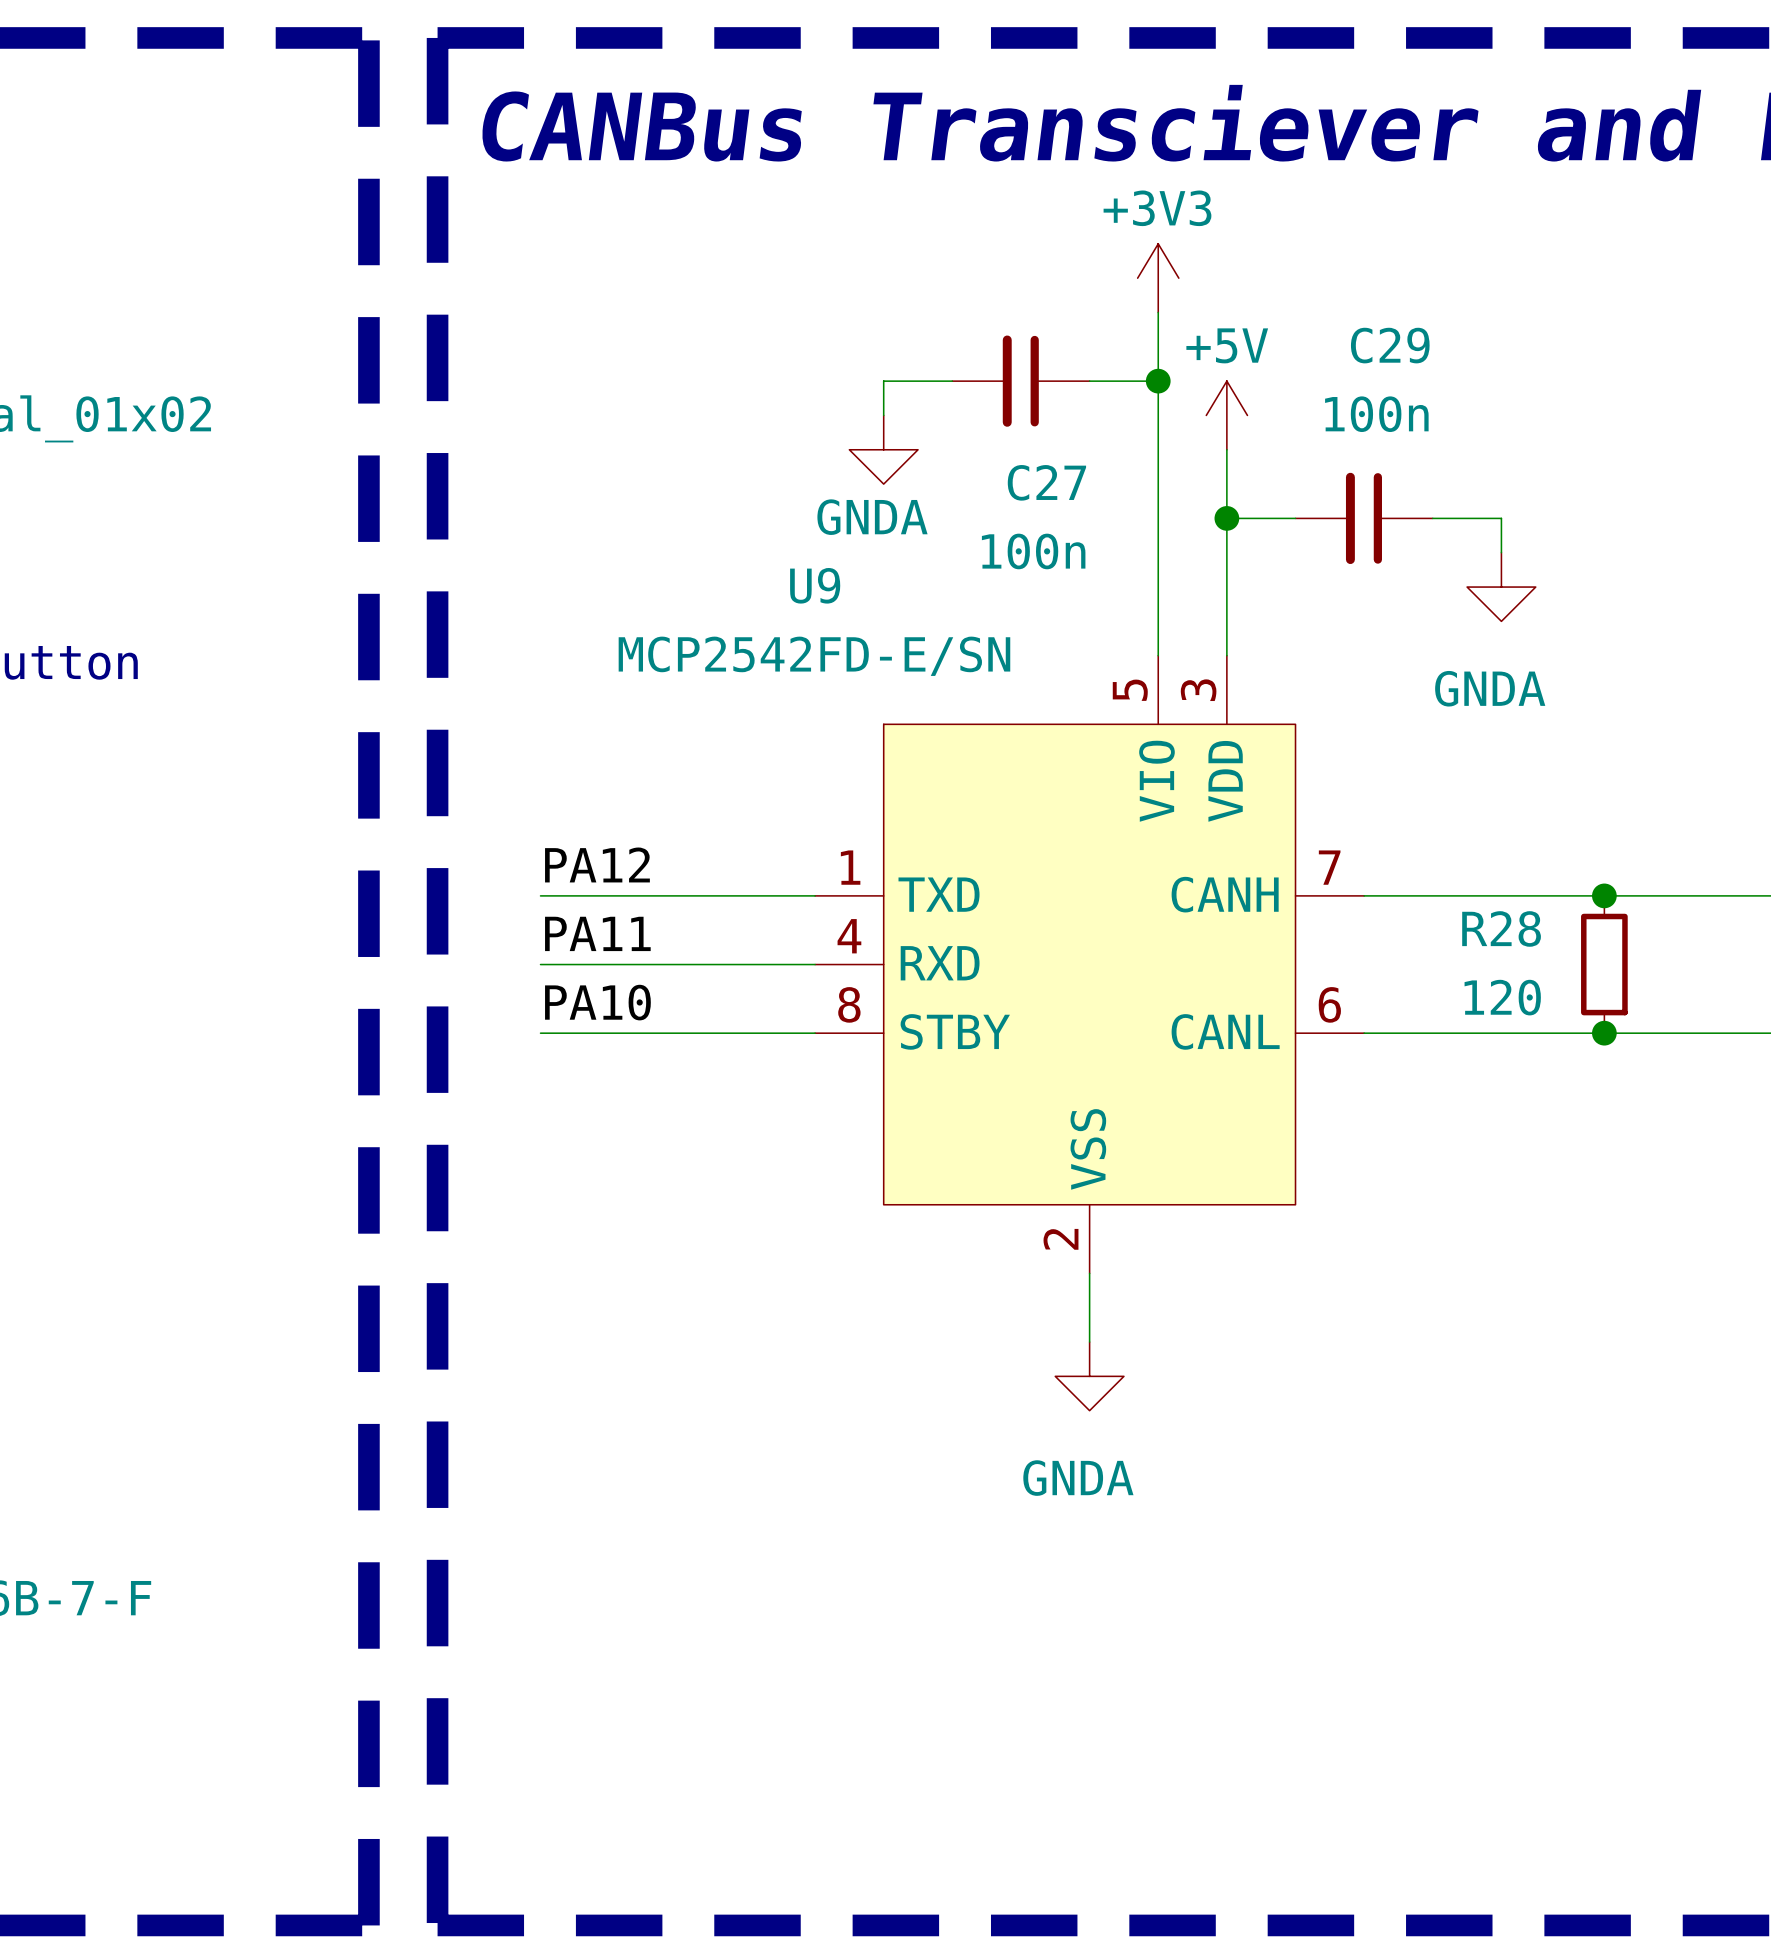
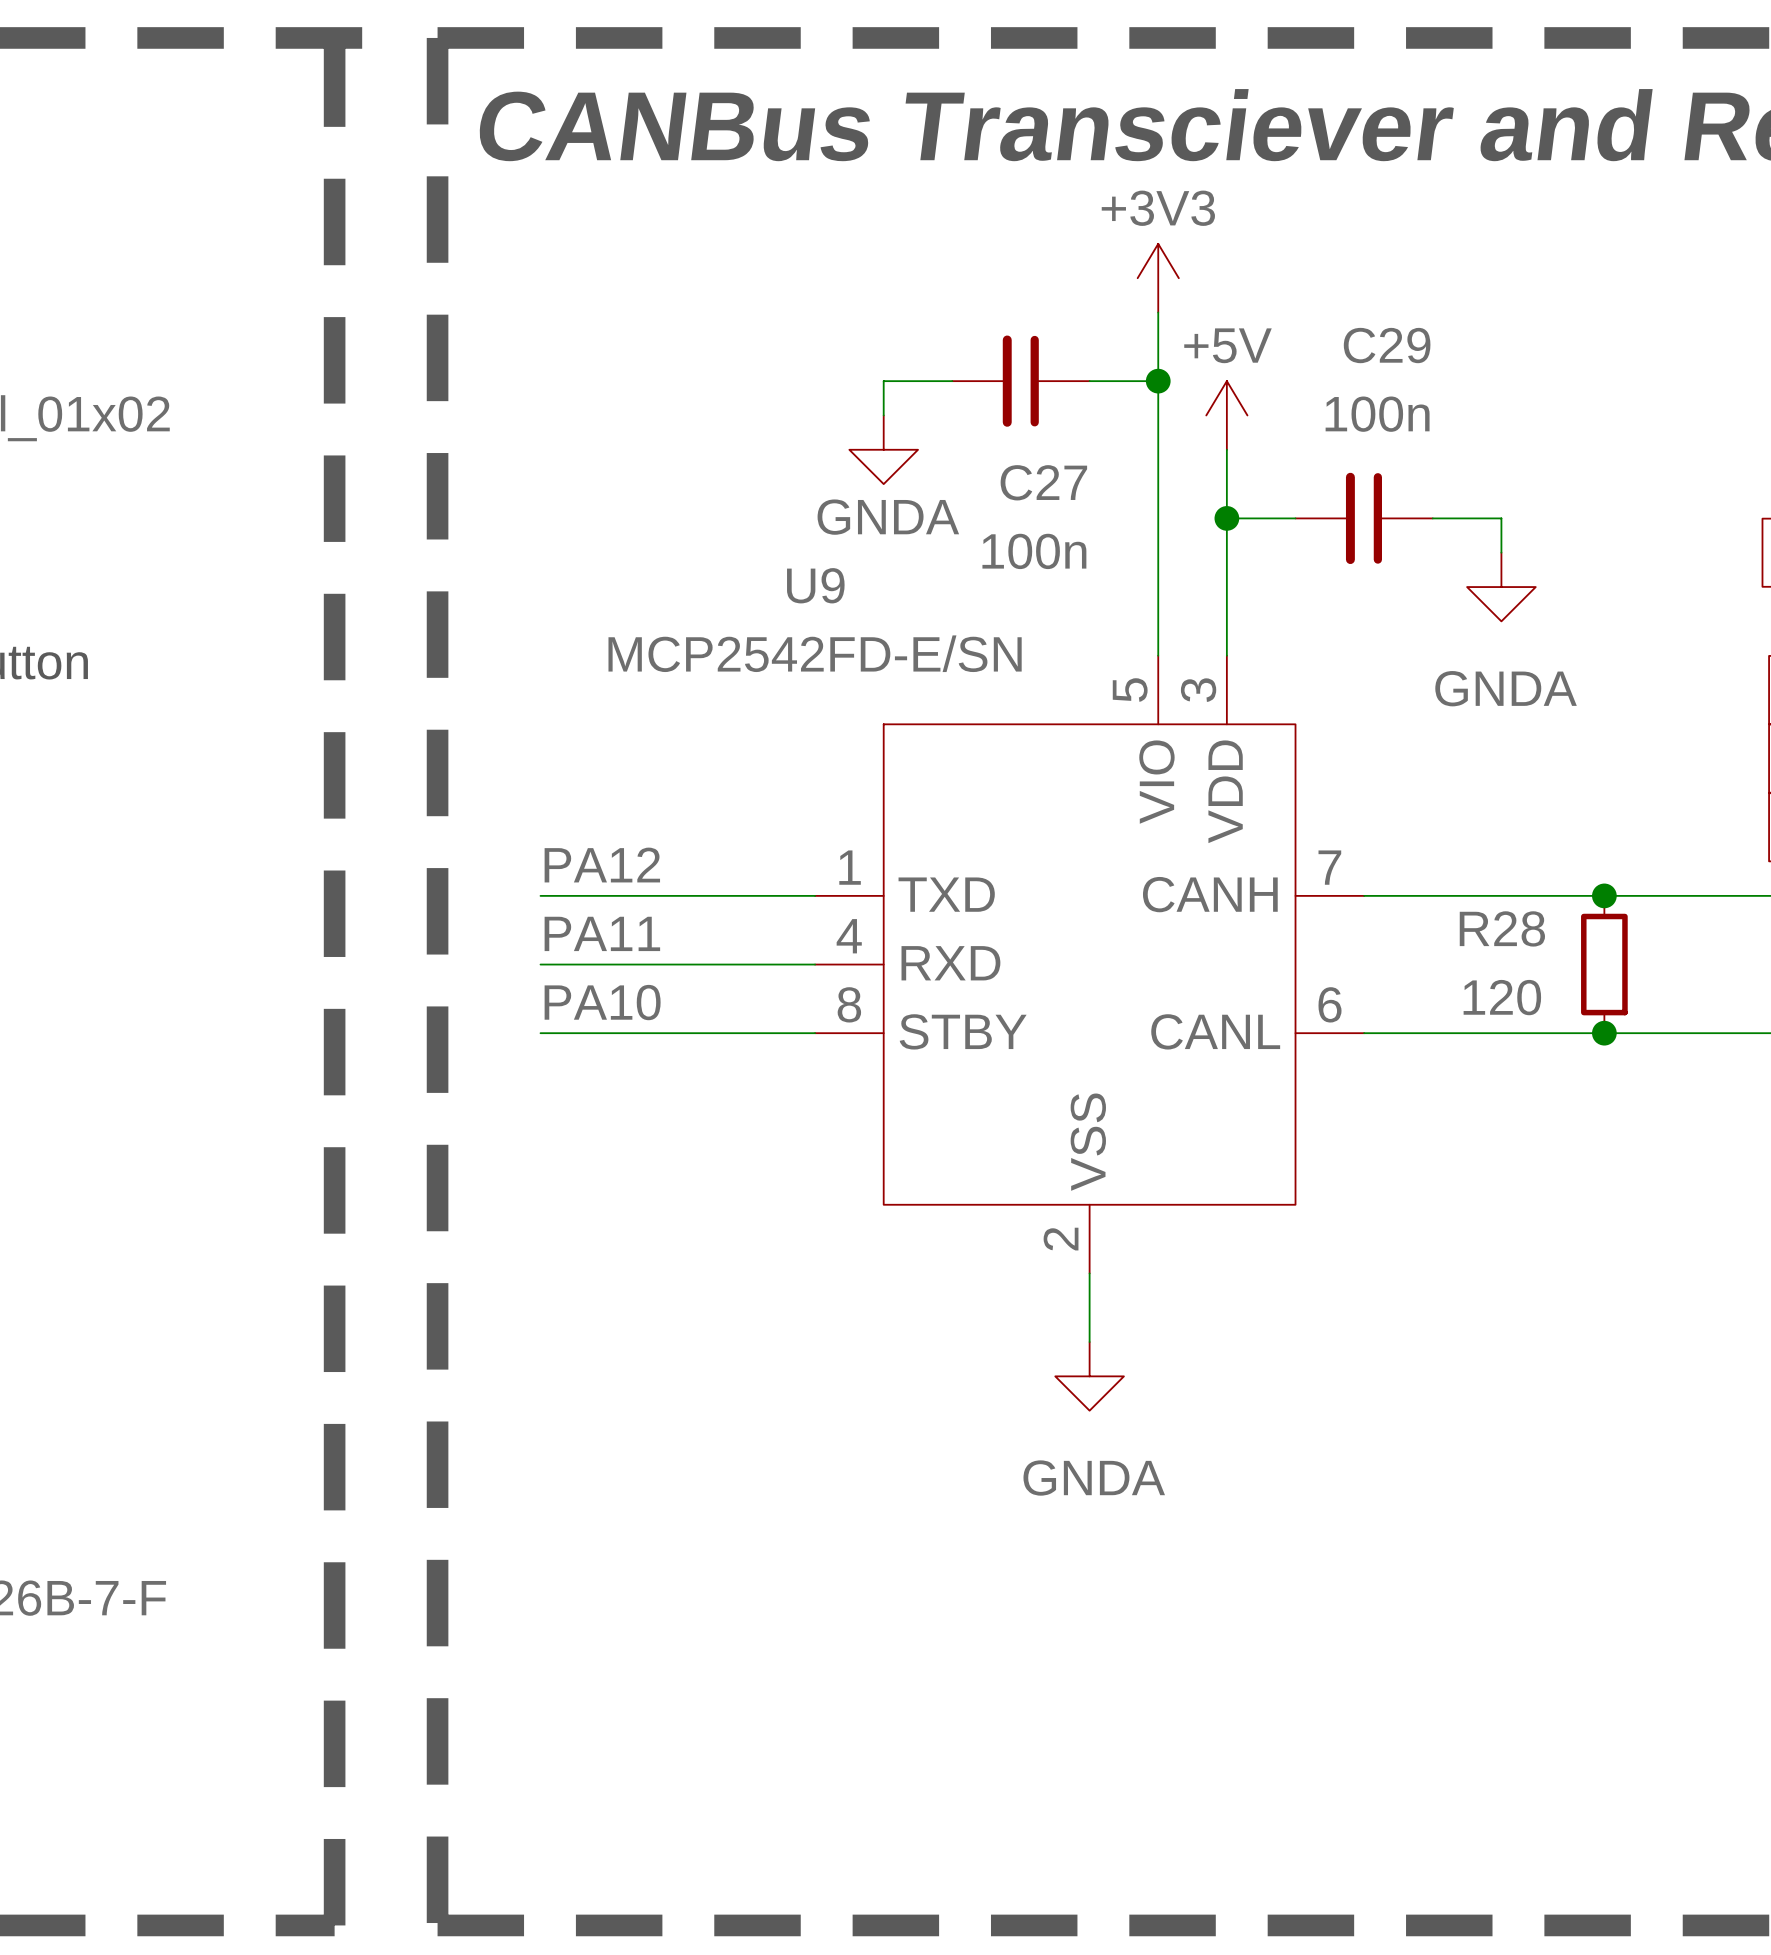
line: (368, 37) (368, 1925) (334, 1925) -> (334, 37) (334, 1925)

